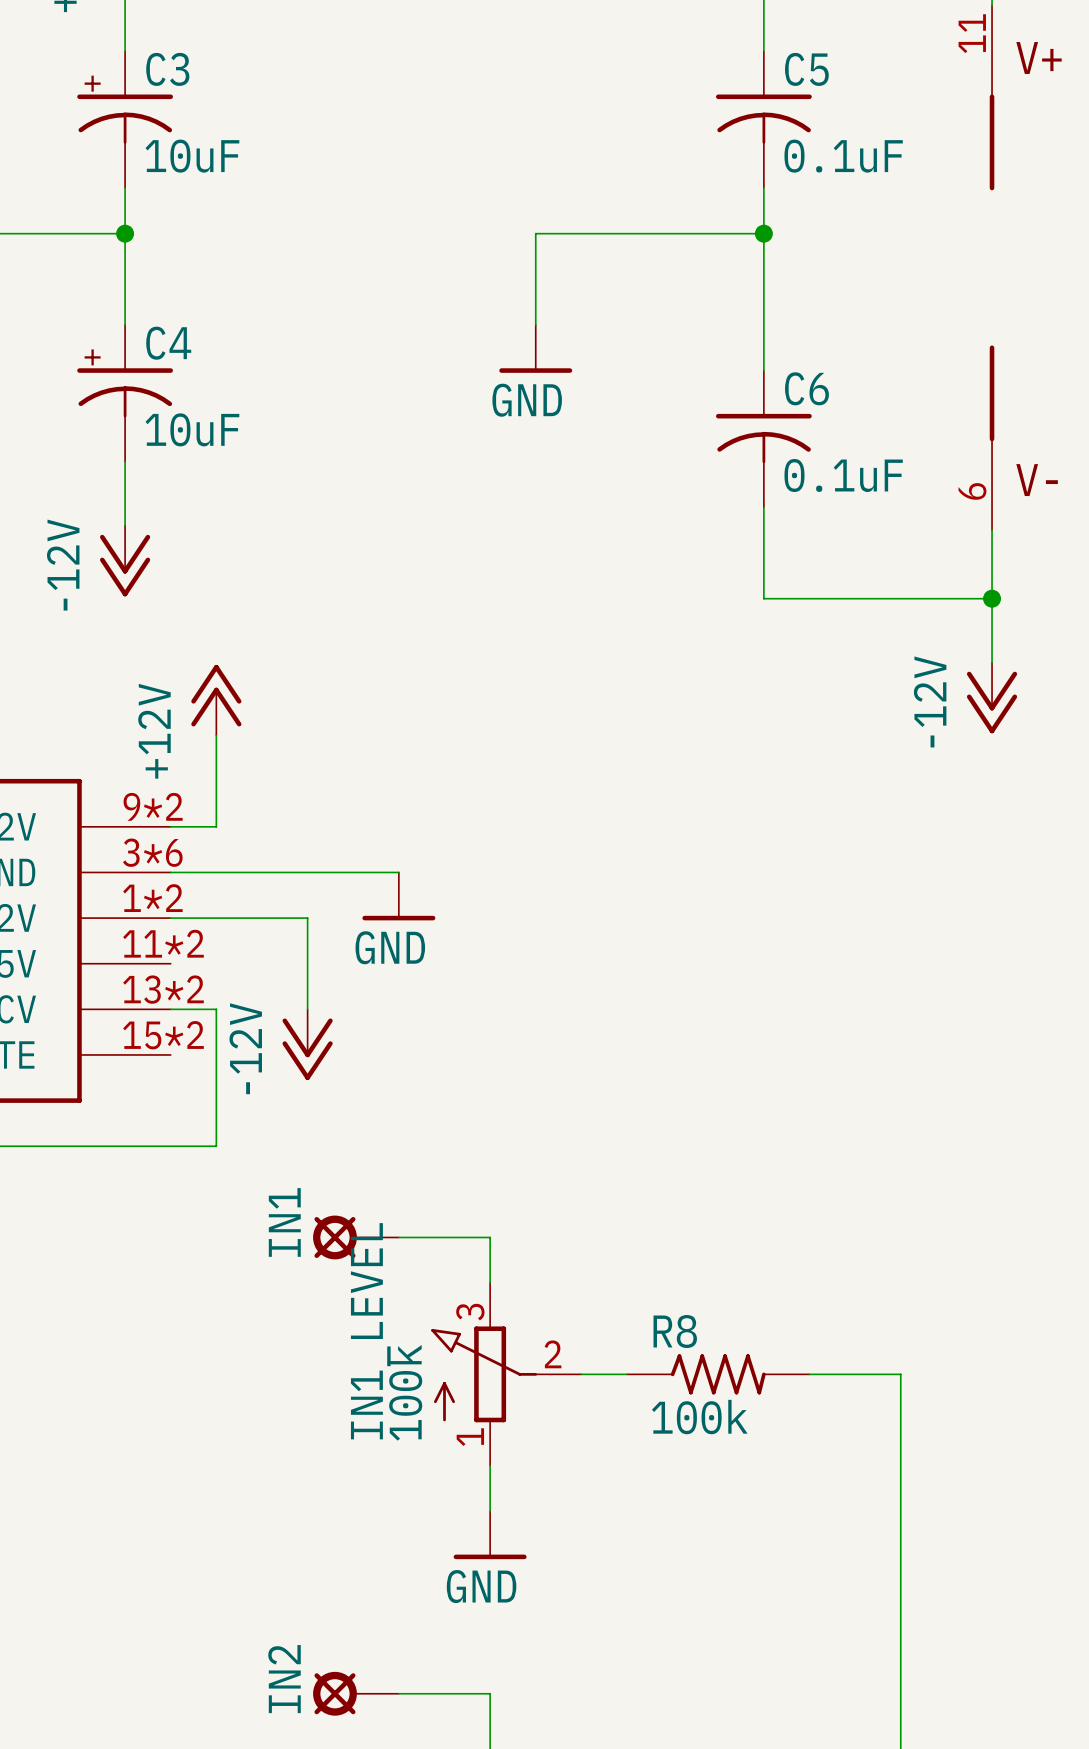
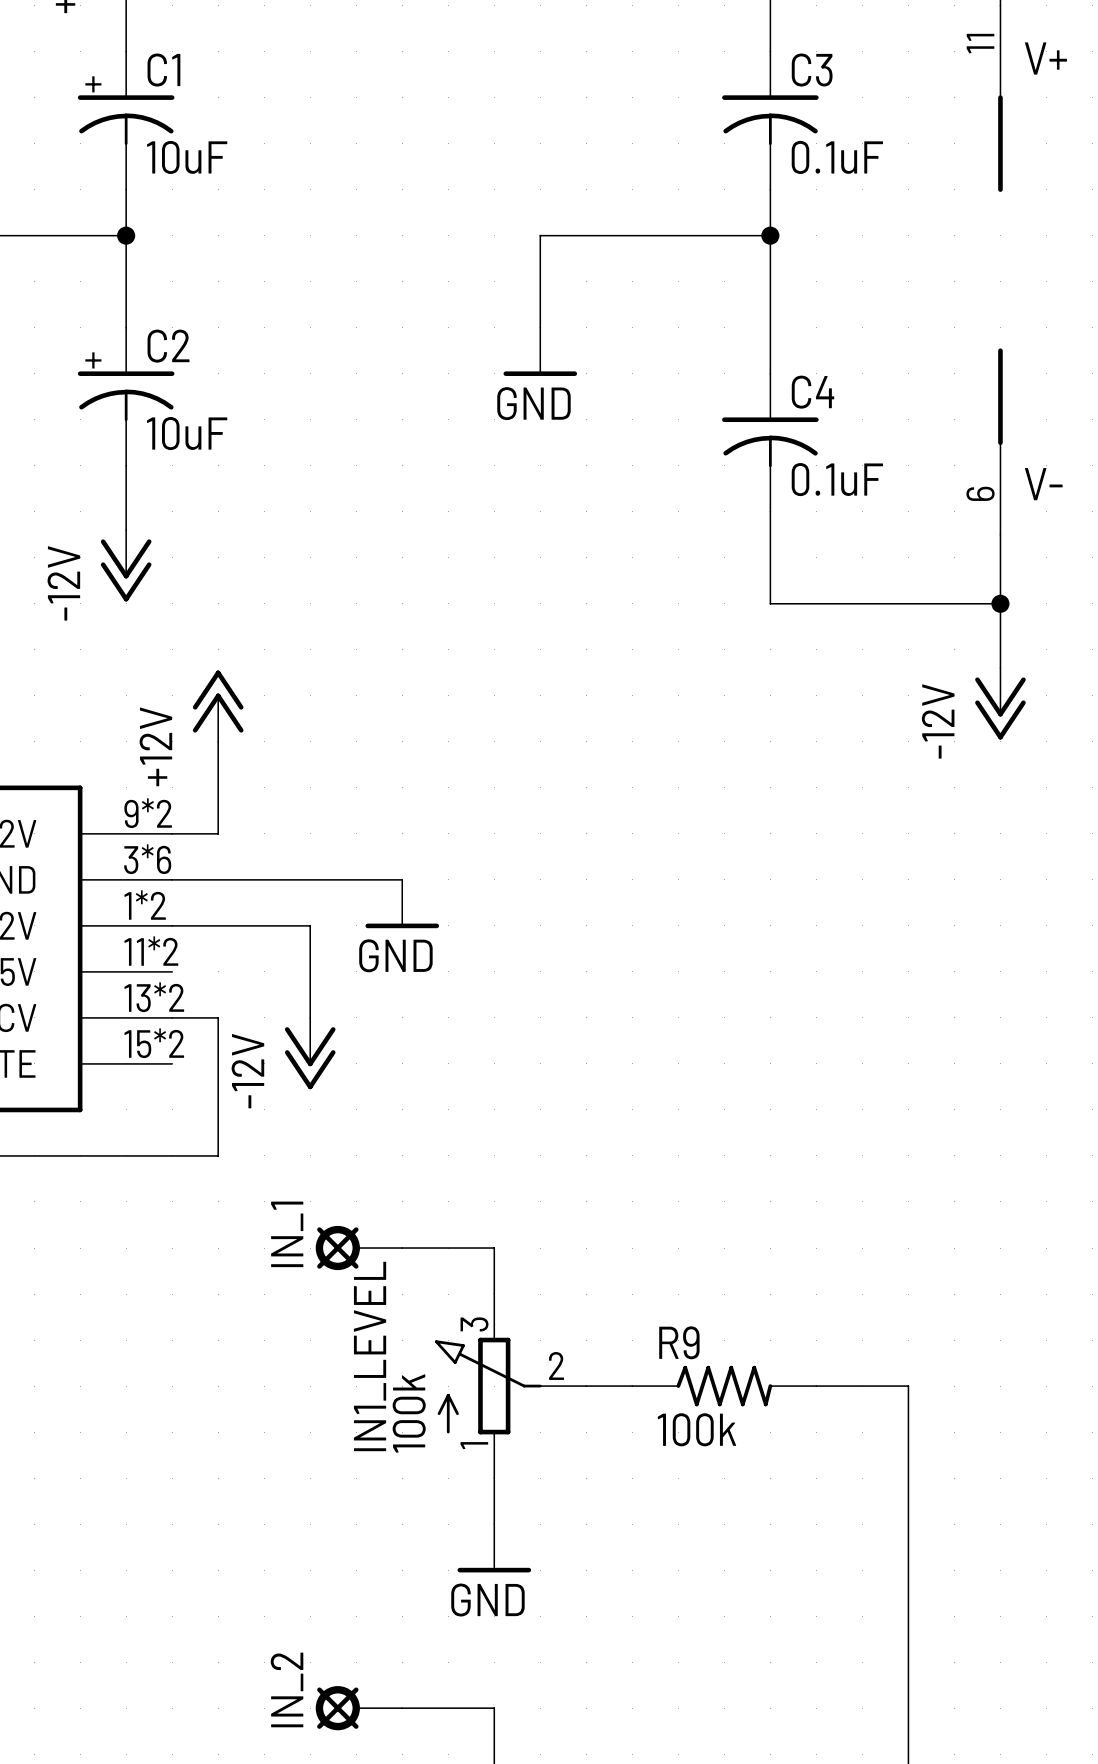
C3 name: C3 (167, 69) -> C1 (163, 70)
C5 name: C5 (806, 69) -> C3 (812, 70)
C4 name: C4 (168, 343) -> C2 (168, 346)
C6 name: C6 (806, 388) -> C4 (812, 392)
IN1 name: IN1 (284, 1222) -> IN_1 (287, 1234)
R8 name: R8 (675, 1331) -> R9 (679, 1342)
IN2 name: IN2 (284, 1679) -> IN_2 (287, 1689)

